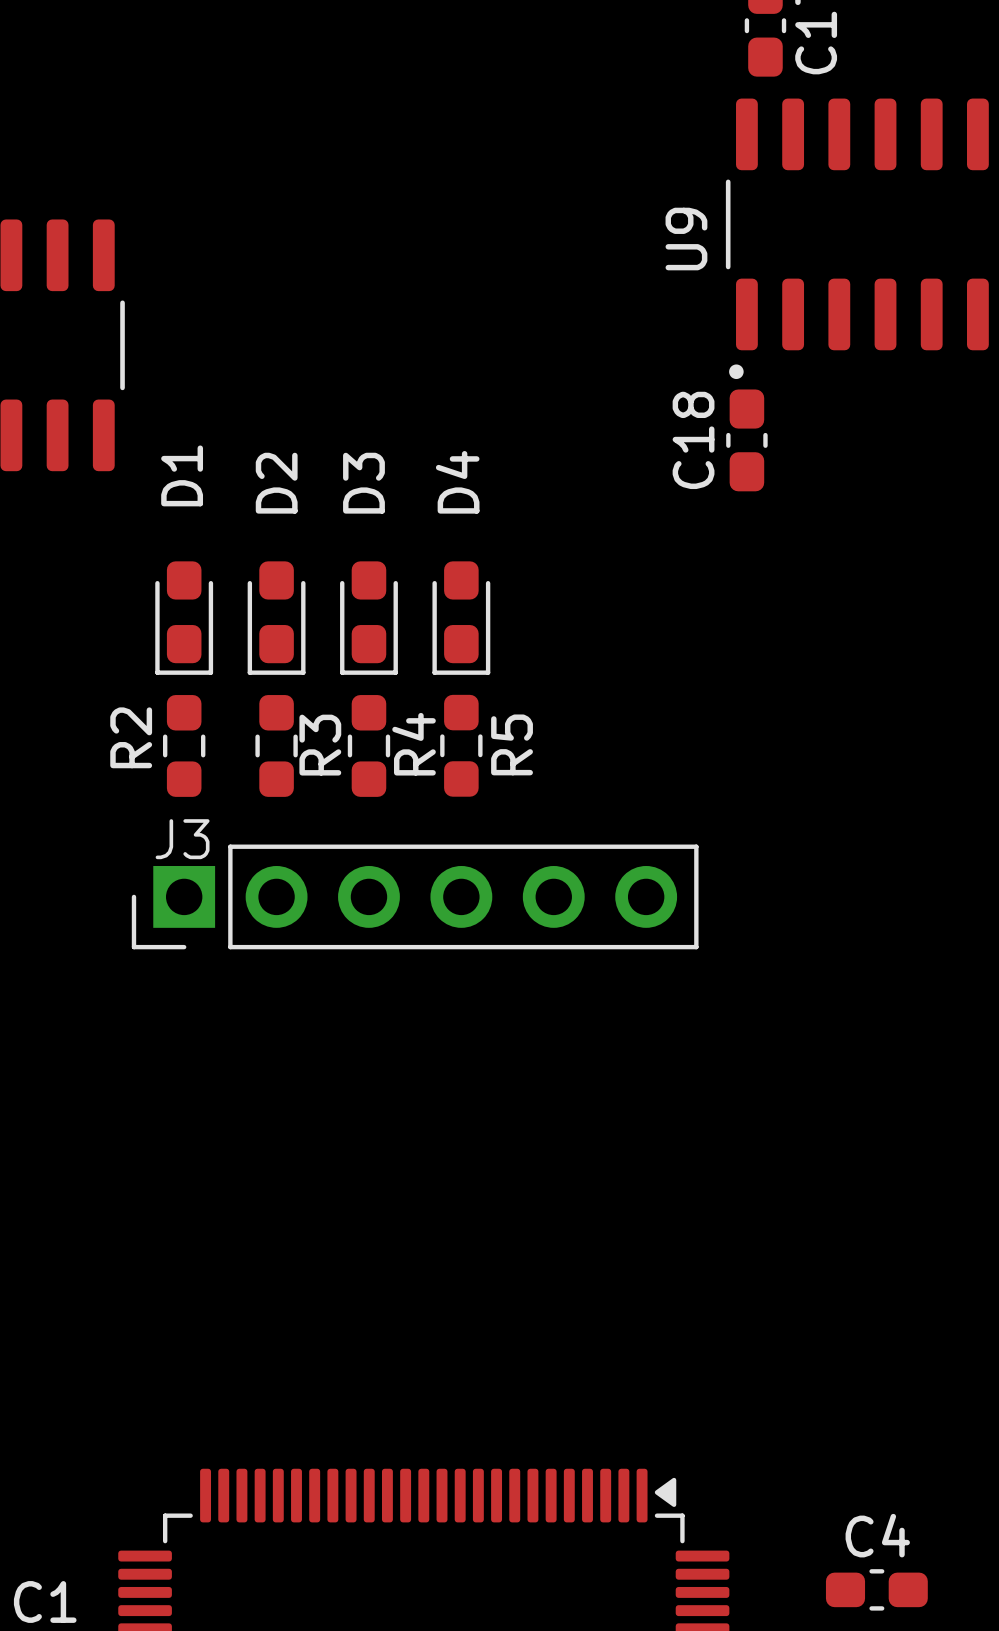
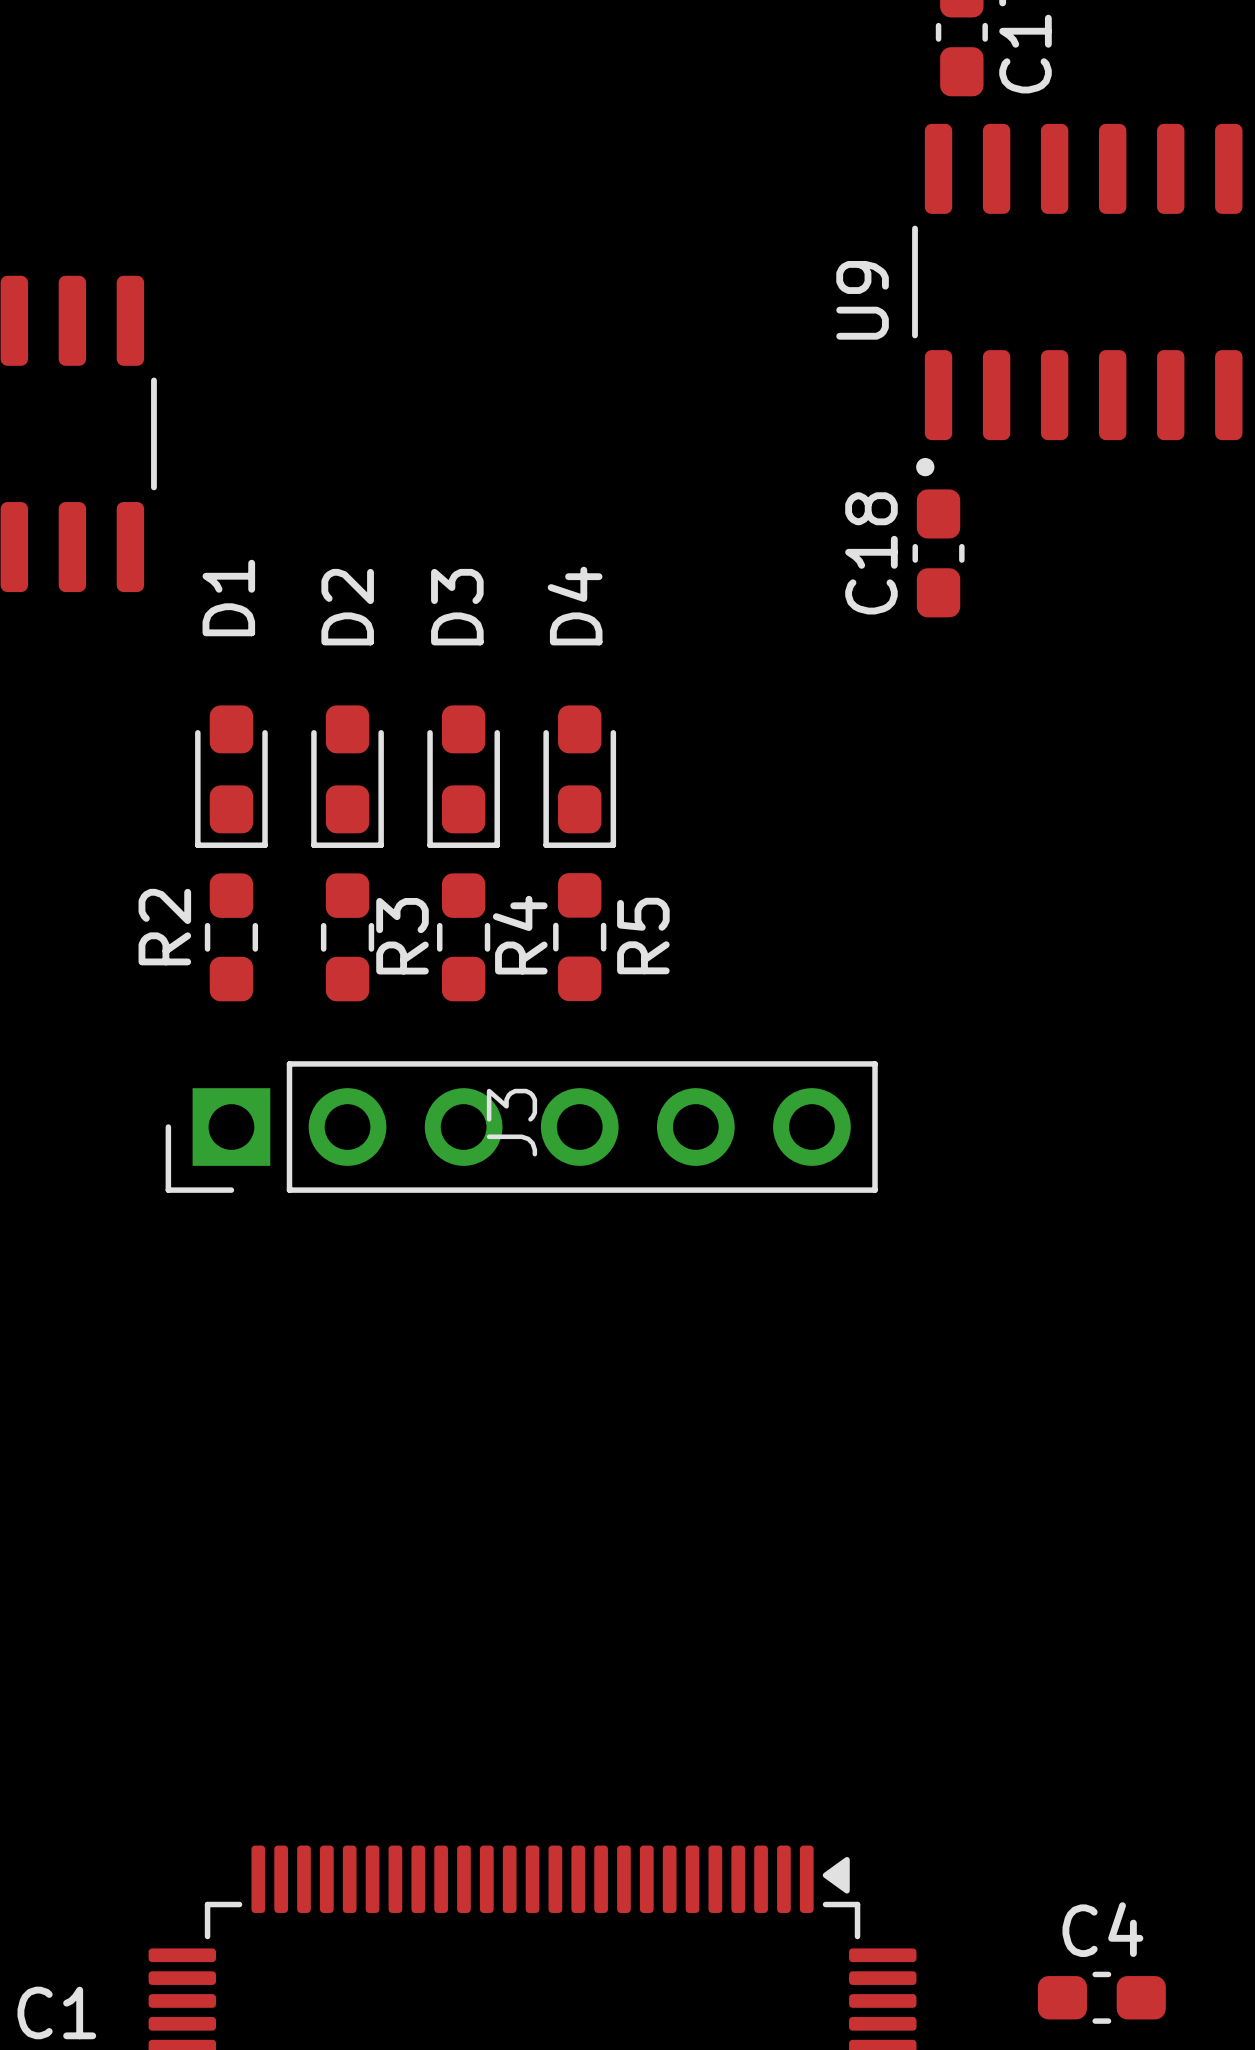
J3 name rotation: 0° (182, 839) -> 90° counterclockwise (511, 1122)
J3 name position: J3 (182, 839) -> J3 (511, 1122)

